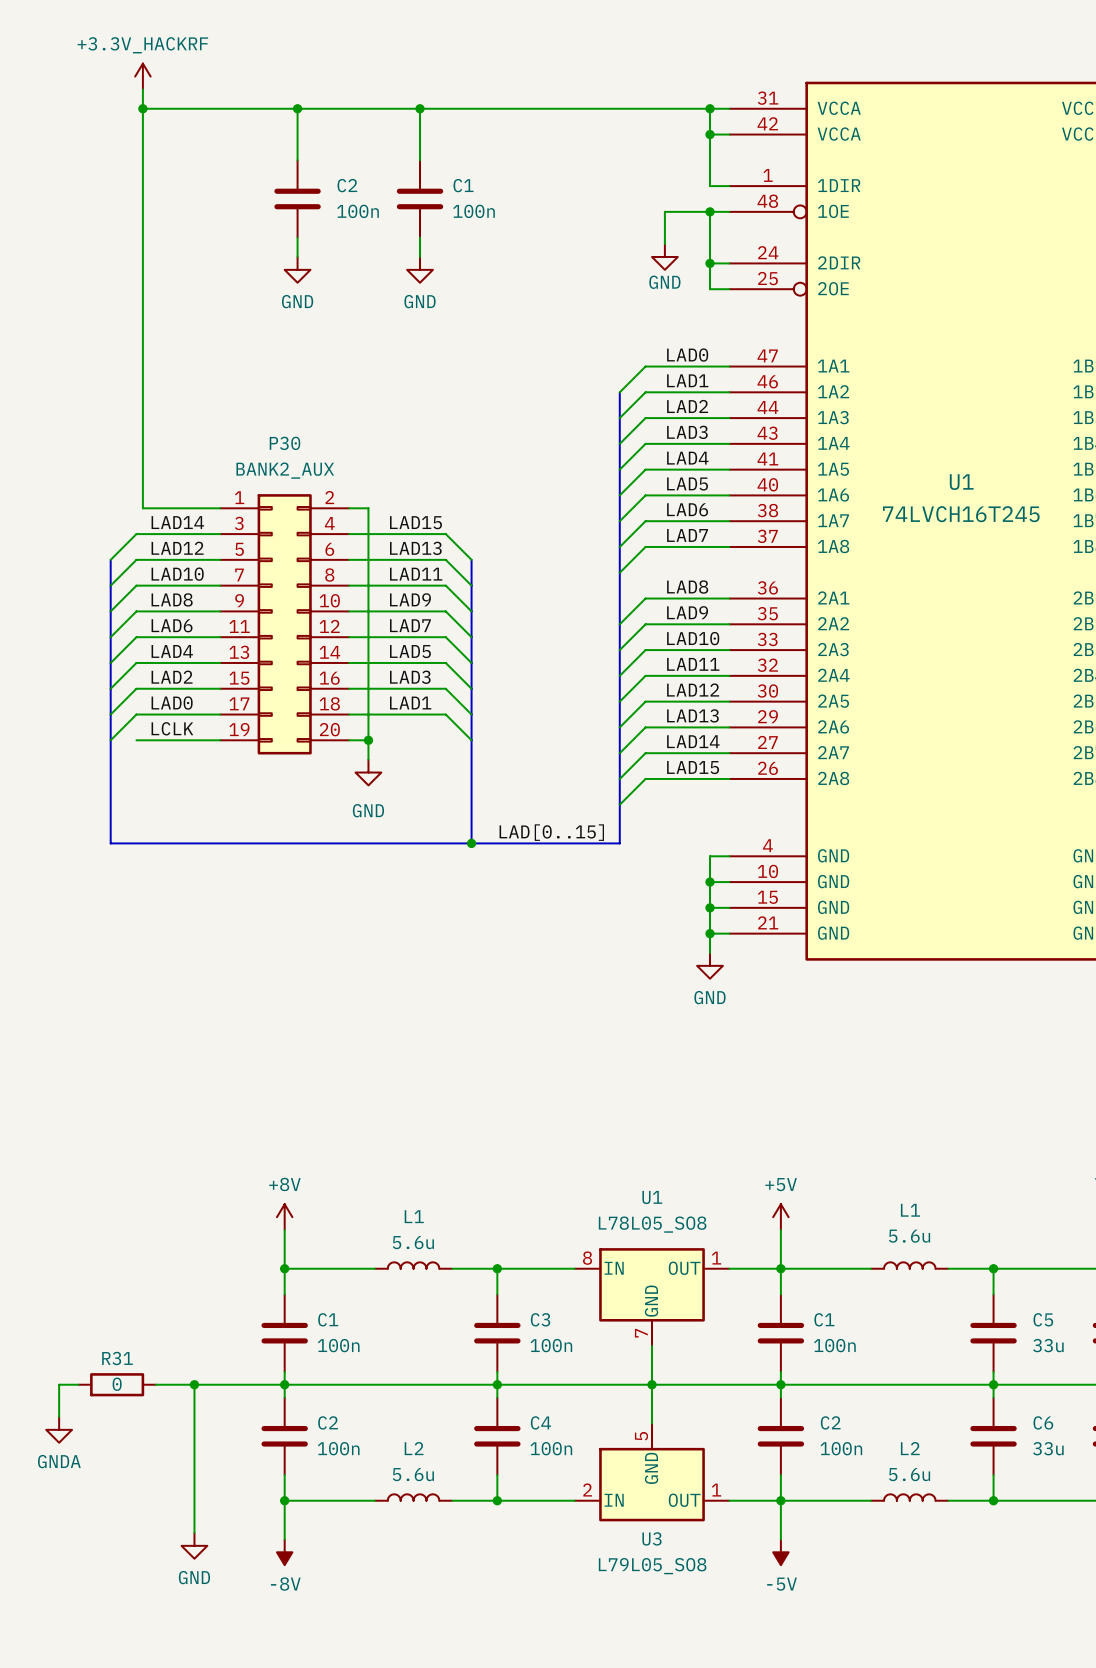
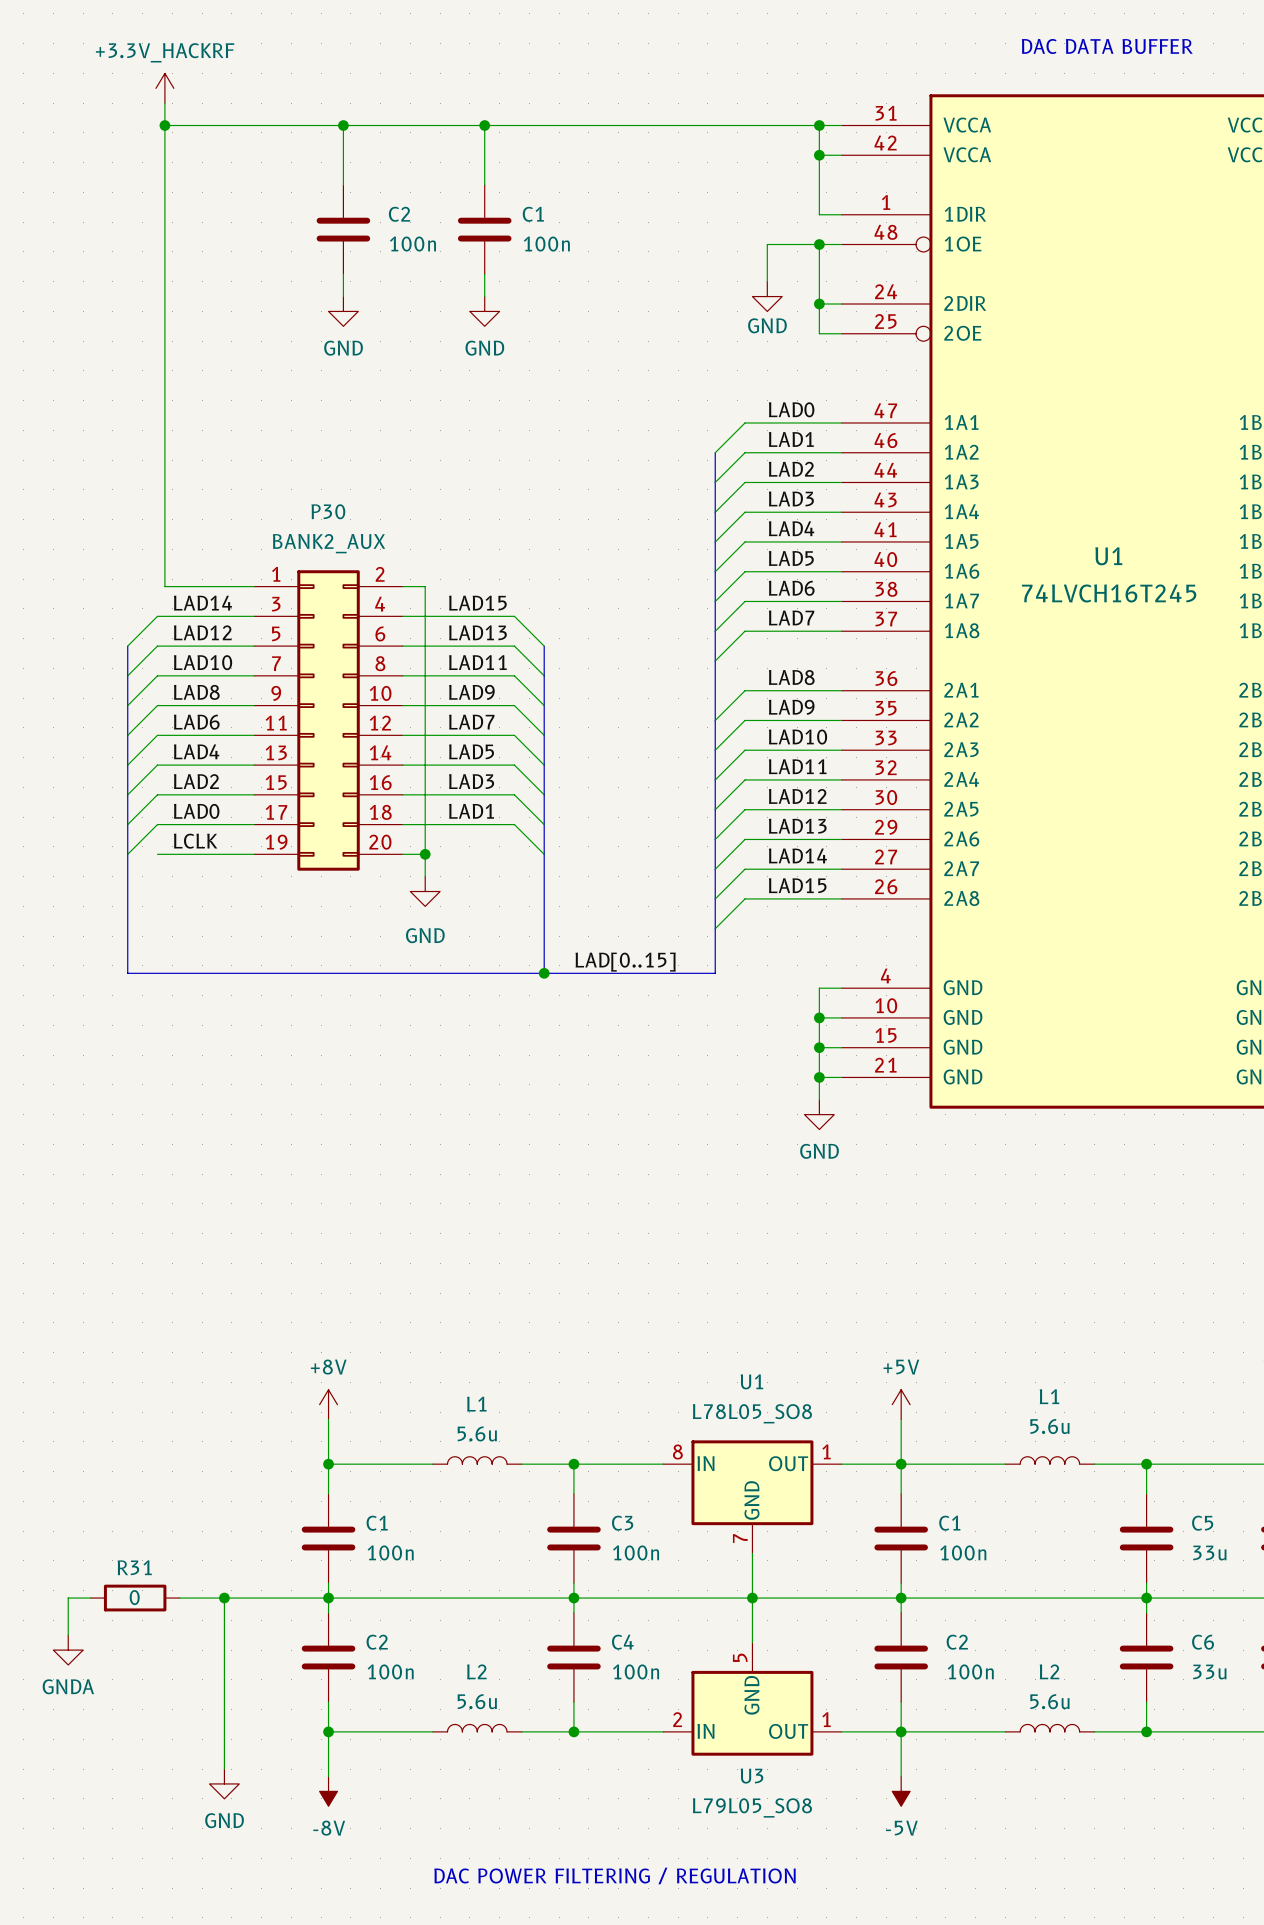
text: none -> DAC DATA BUFFER (1107, 46)
text: none -> DAC POWER FILTERING / REGULATION (614, 1875)

